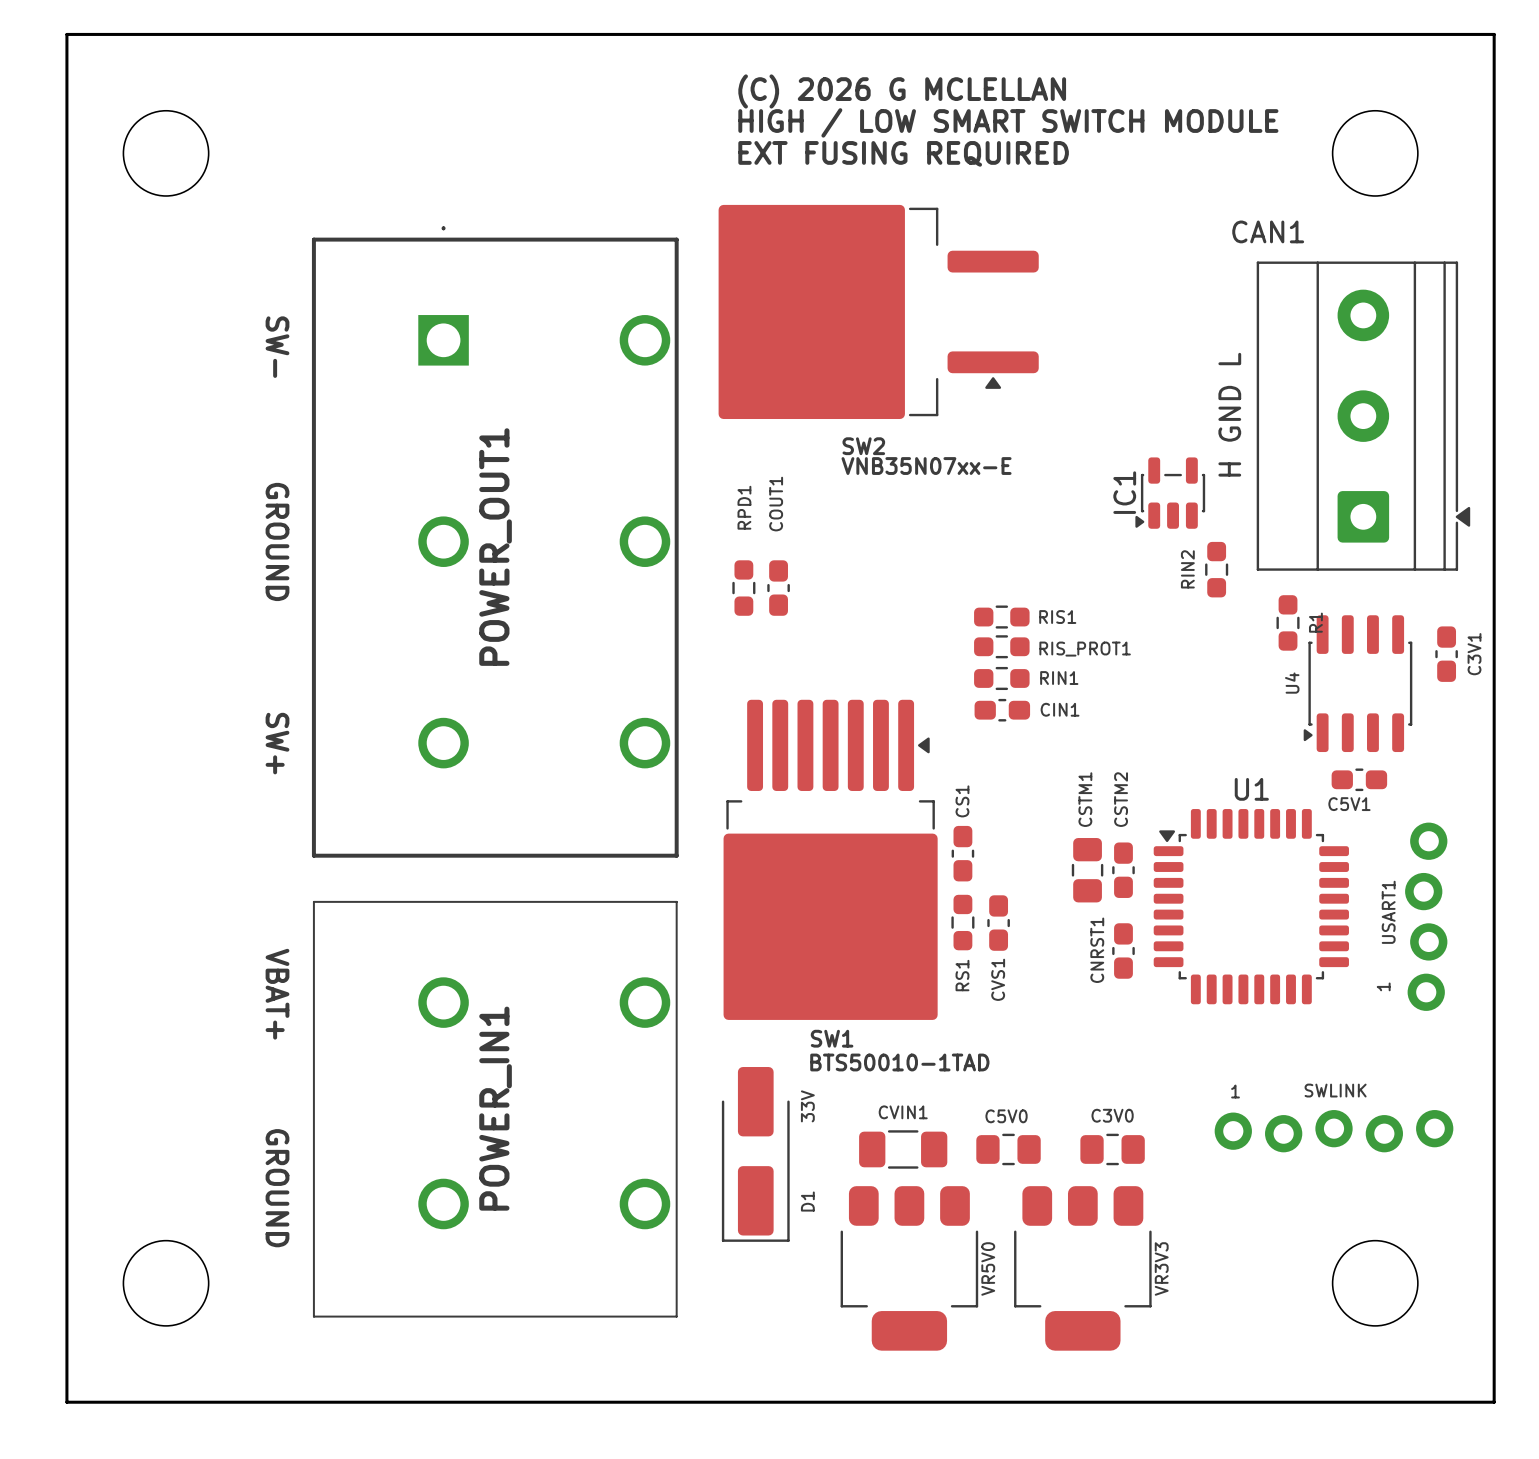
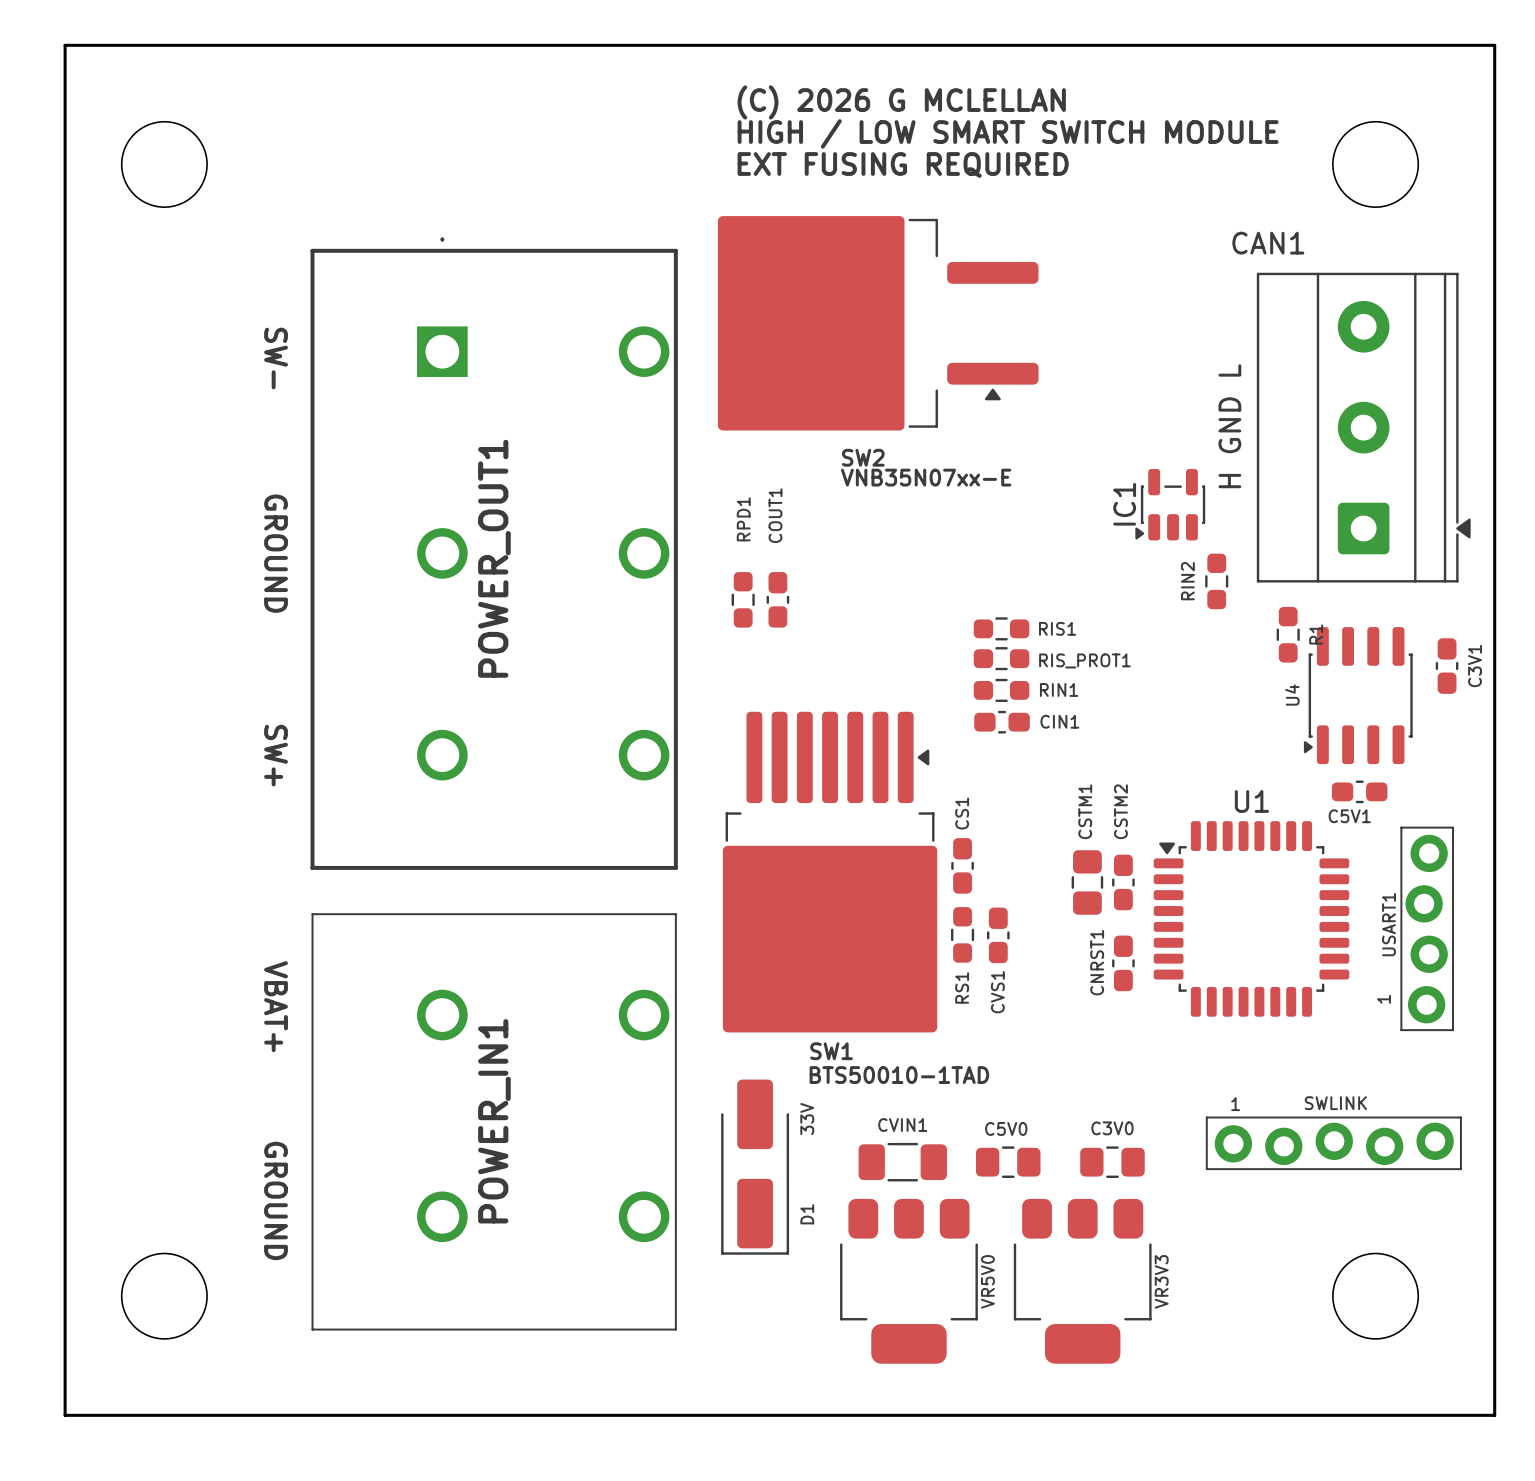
line: none -> (1401, 827) (1453, 827) (1453, 1030) (1401, 1030) (1401, 827)
line: none -> (1206, 1117) (1460, 1117) (1460, 1169) (1206, 1169) (1206, 1117)

